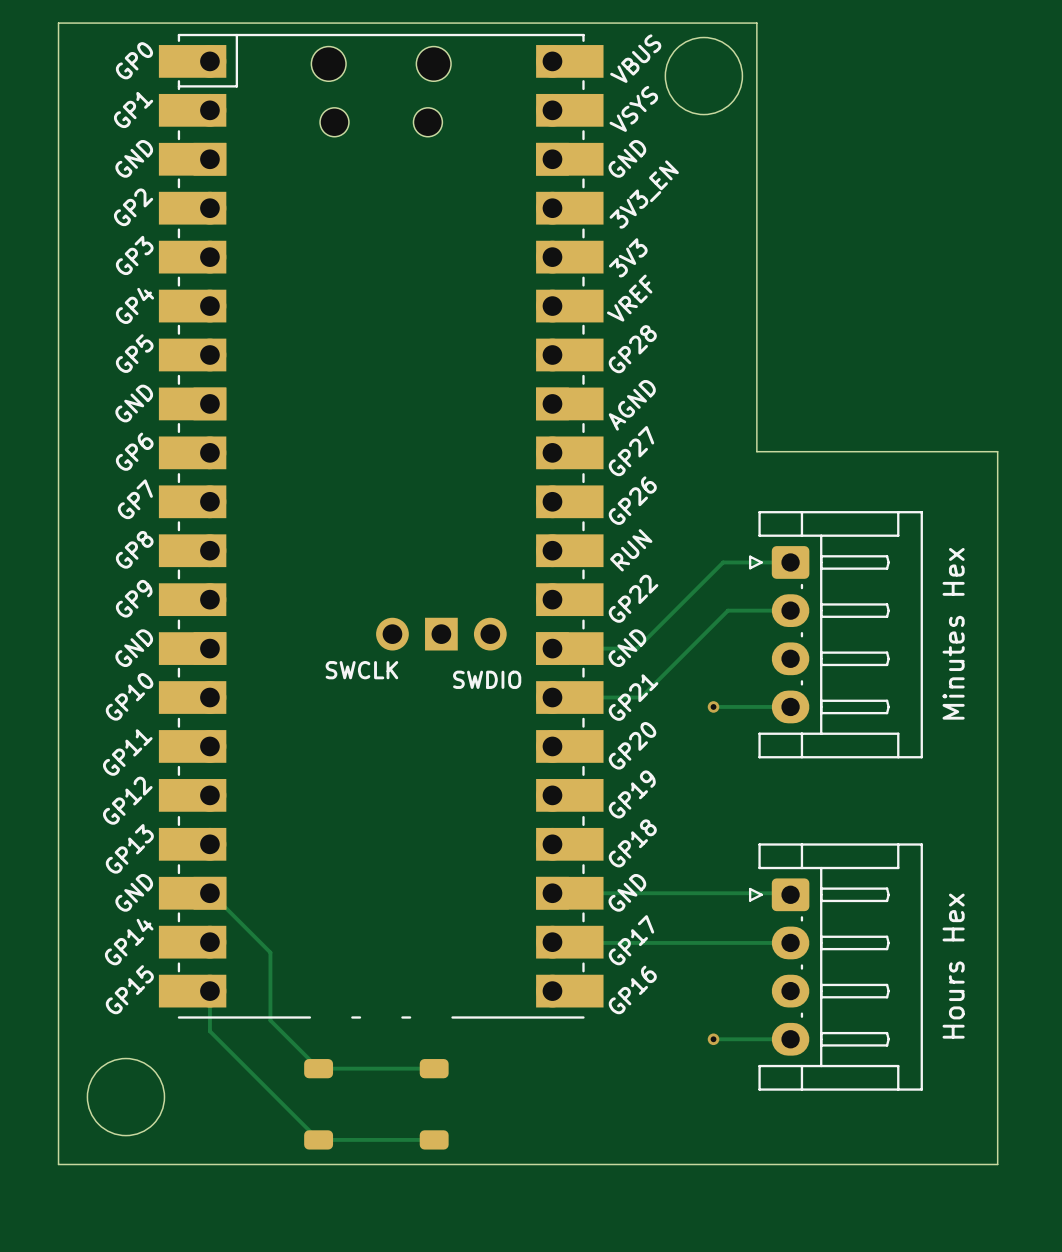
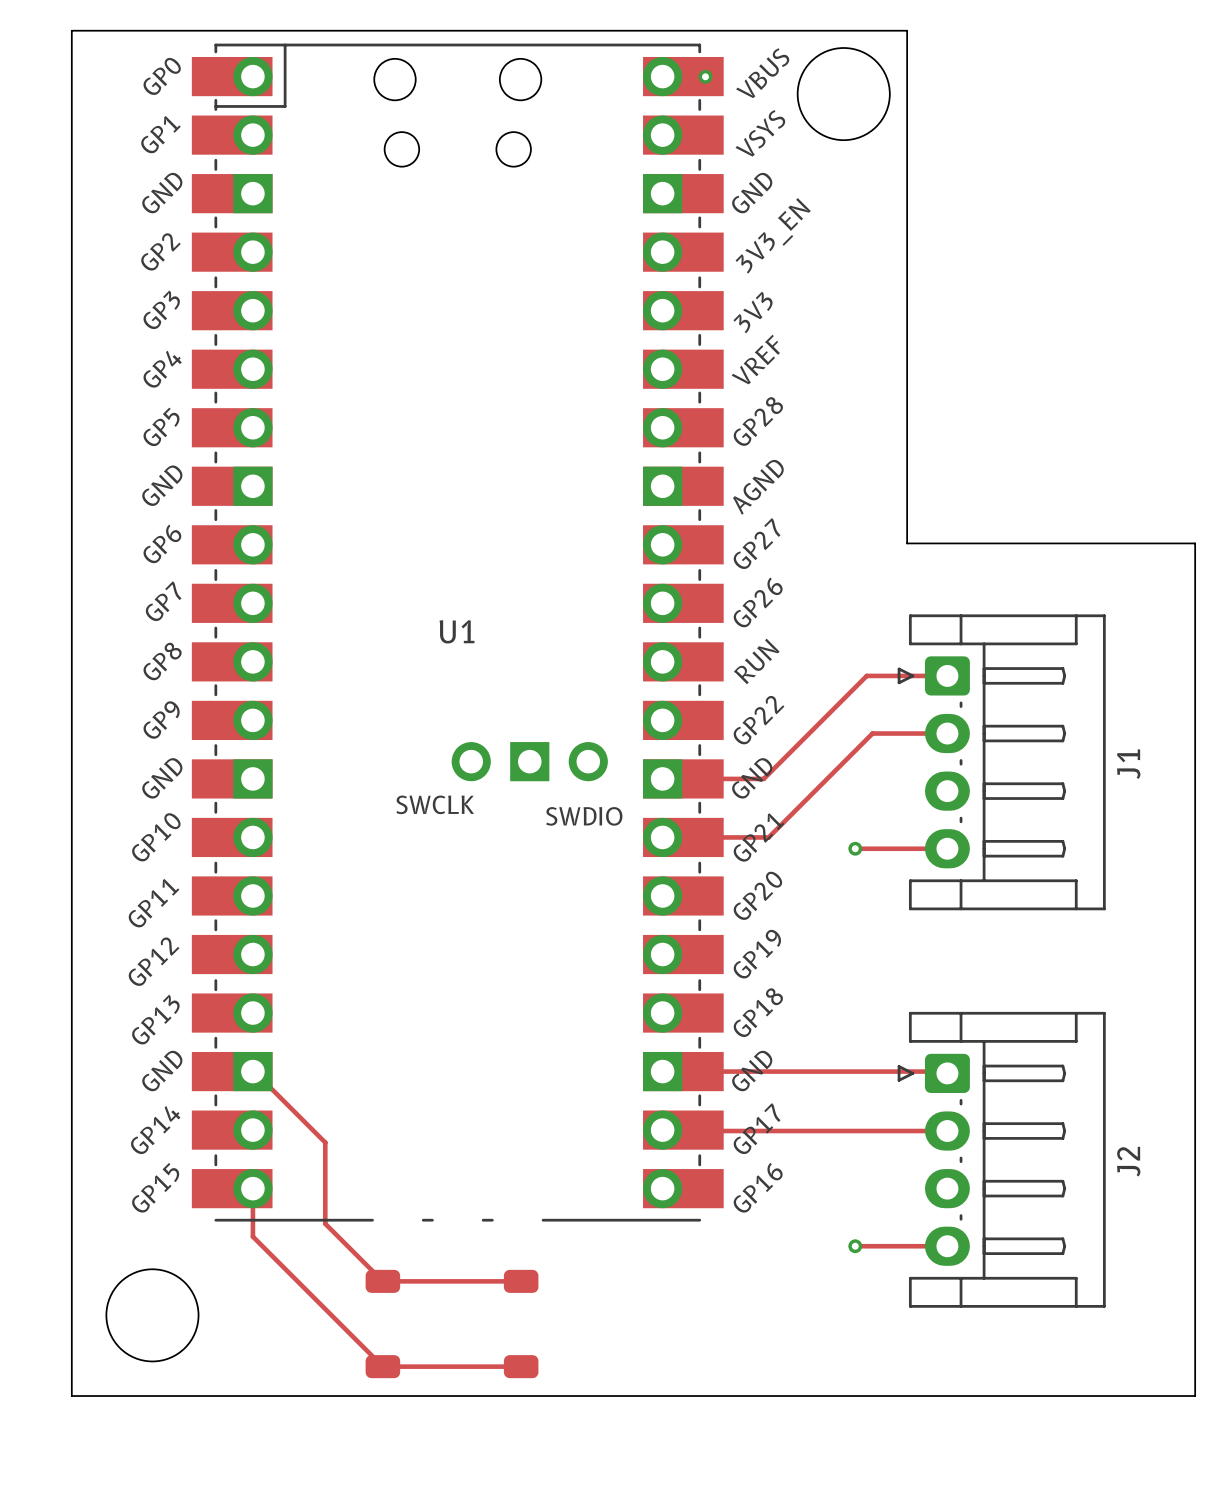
via: none -> (705, 76)
U1 name: none -> U1 (457, 631)
Minutes Hex name: Minutes Hex (953, 633) -> J1 (1128, 764)
Hours Hex name: Hours Hex (953, 966) -> J2 (1128, 1161)

